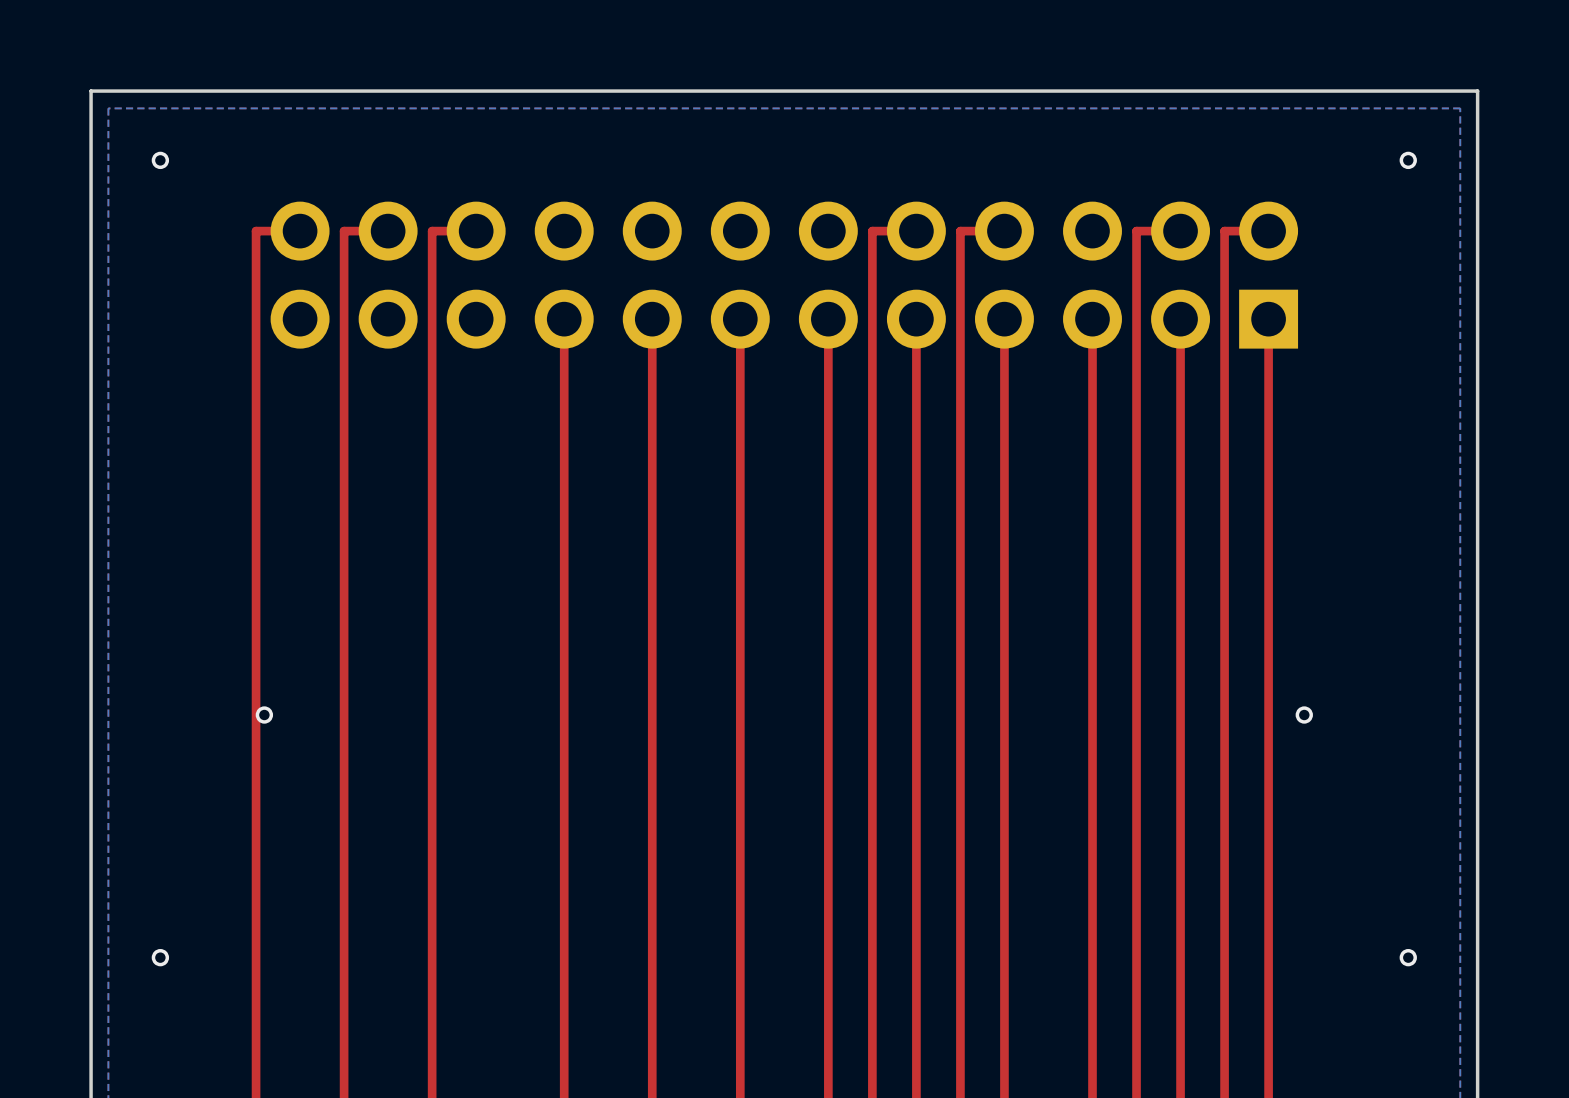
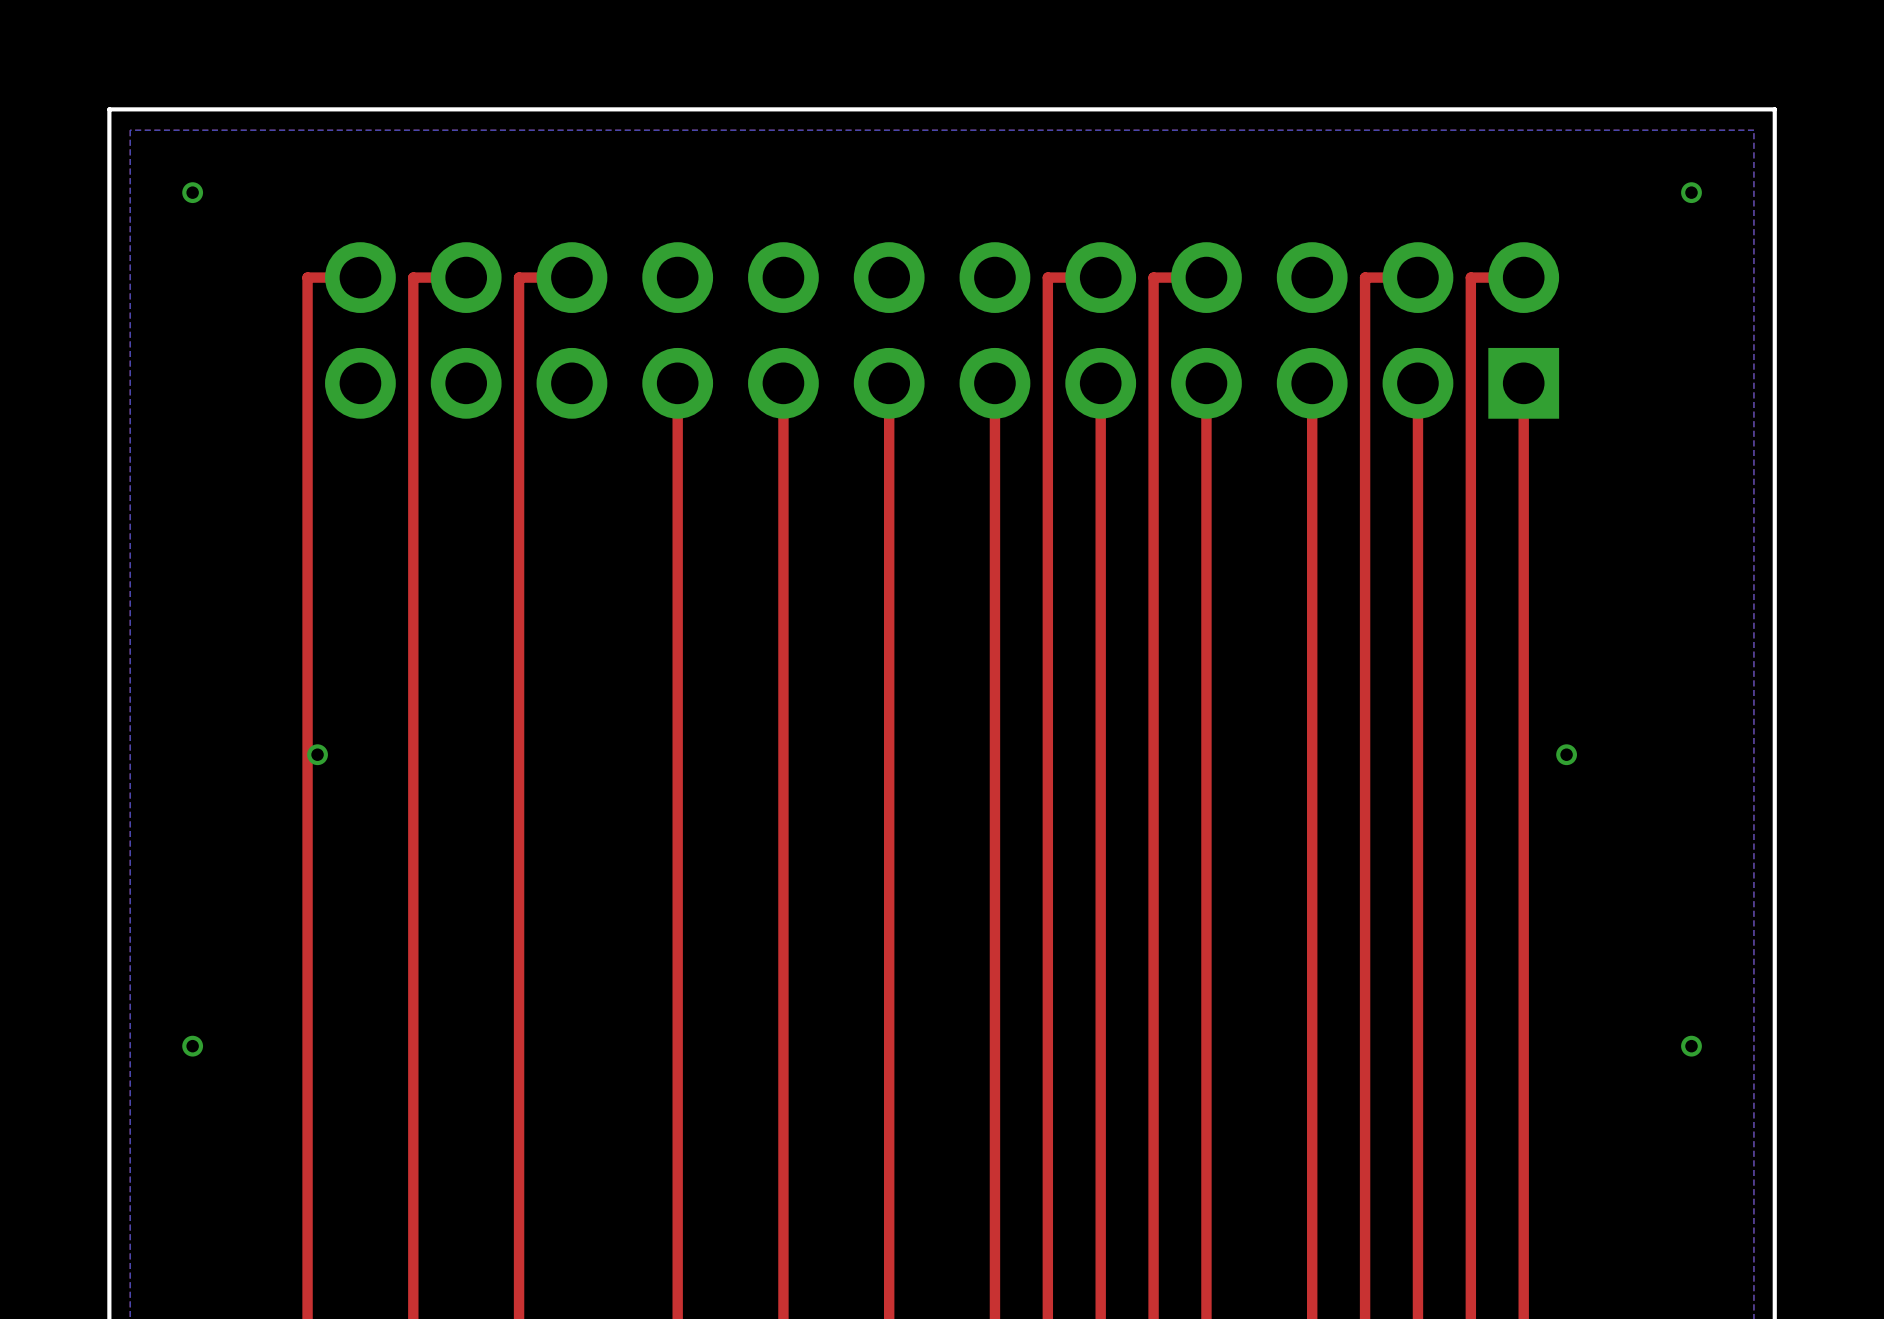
via position: (264, 715) -> (317, 754)
via position: (1304, 715) -> (1566, 754)
via position: (160, 957) -> (192, 1046)
via position: (1408, 957) -> (1691, 1046)

